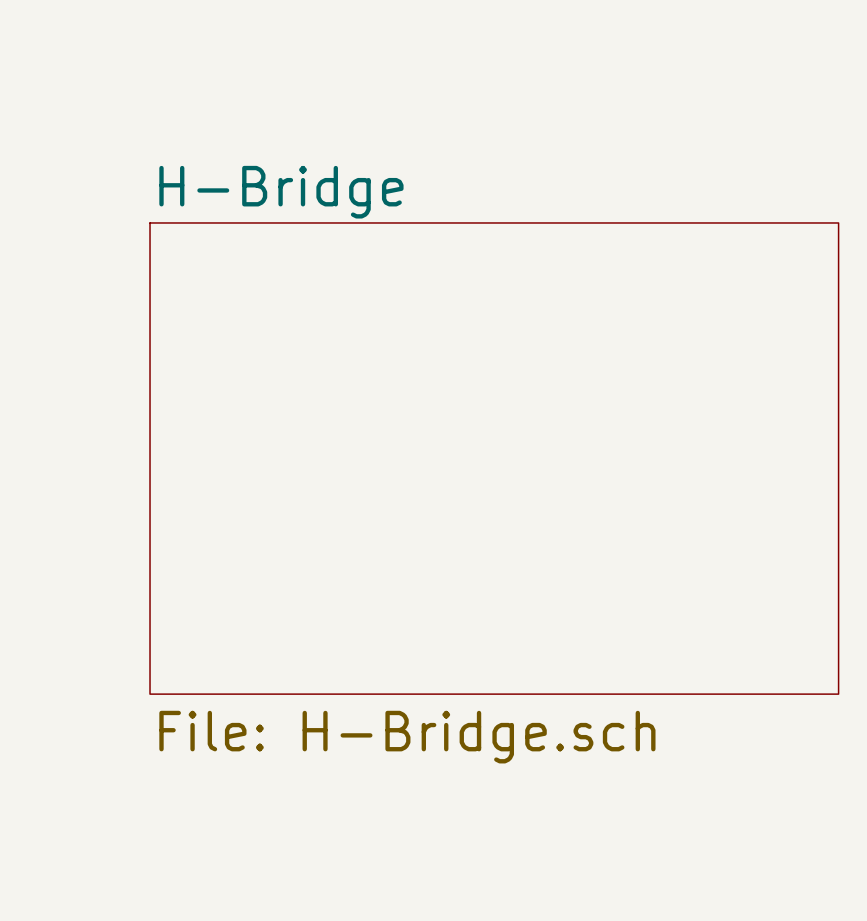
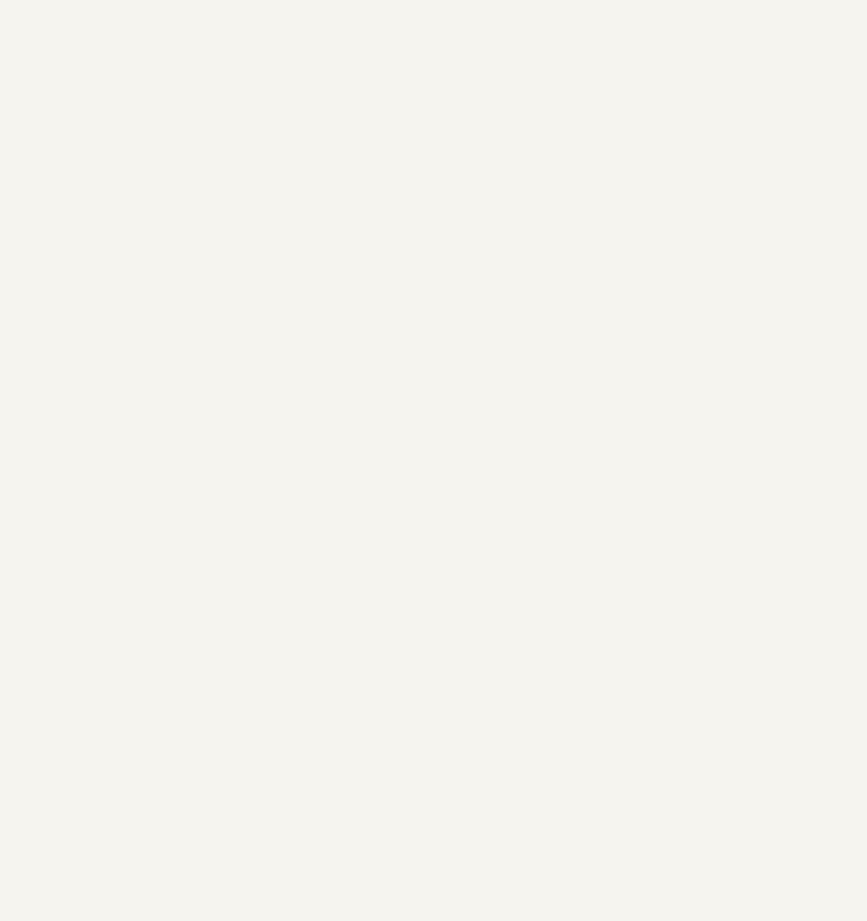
sheet H-Bridge: File: H-Bridge.sch (494, 458) -> none

